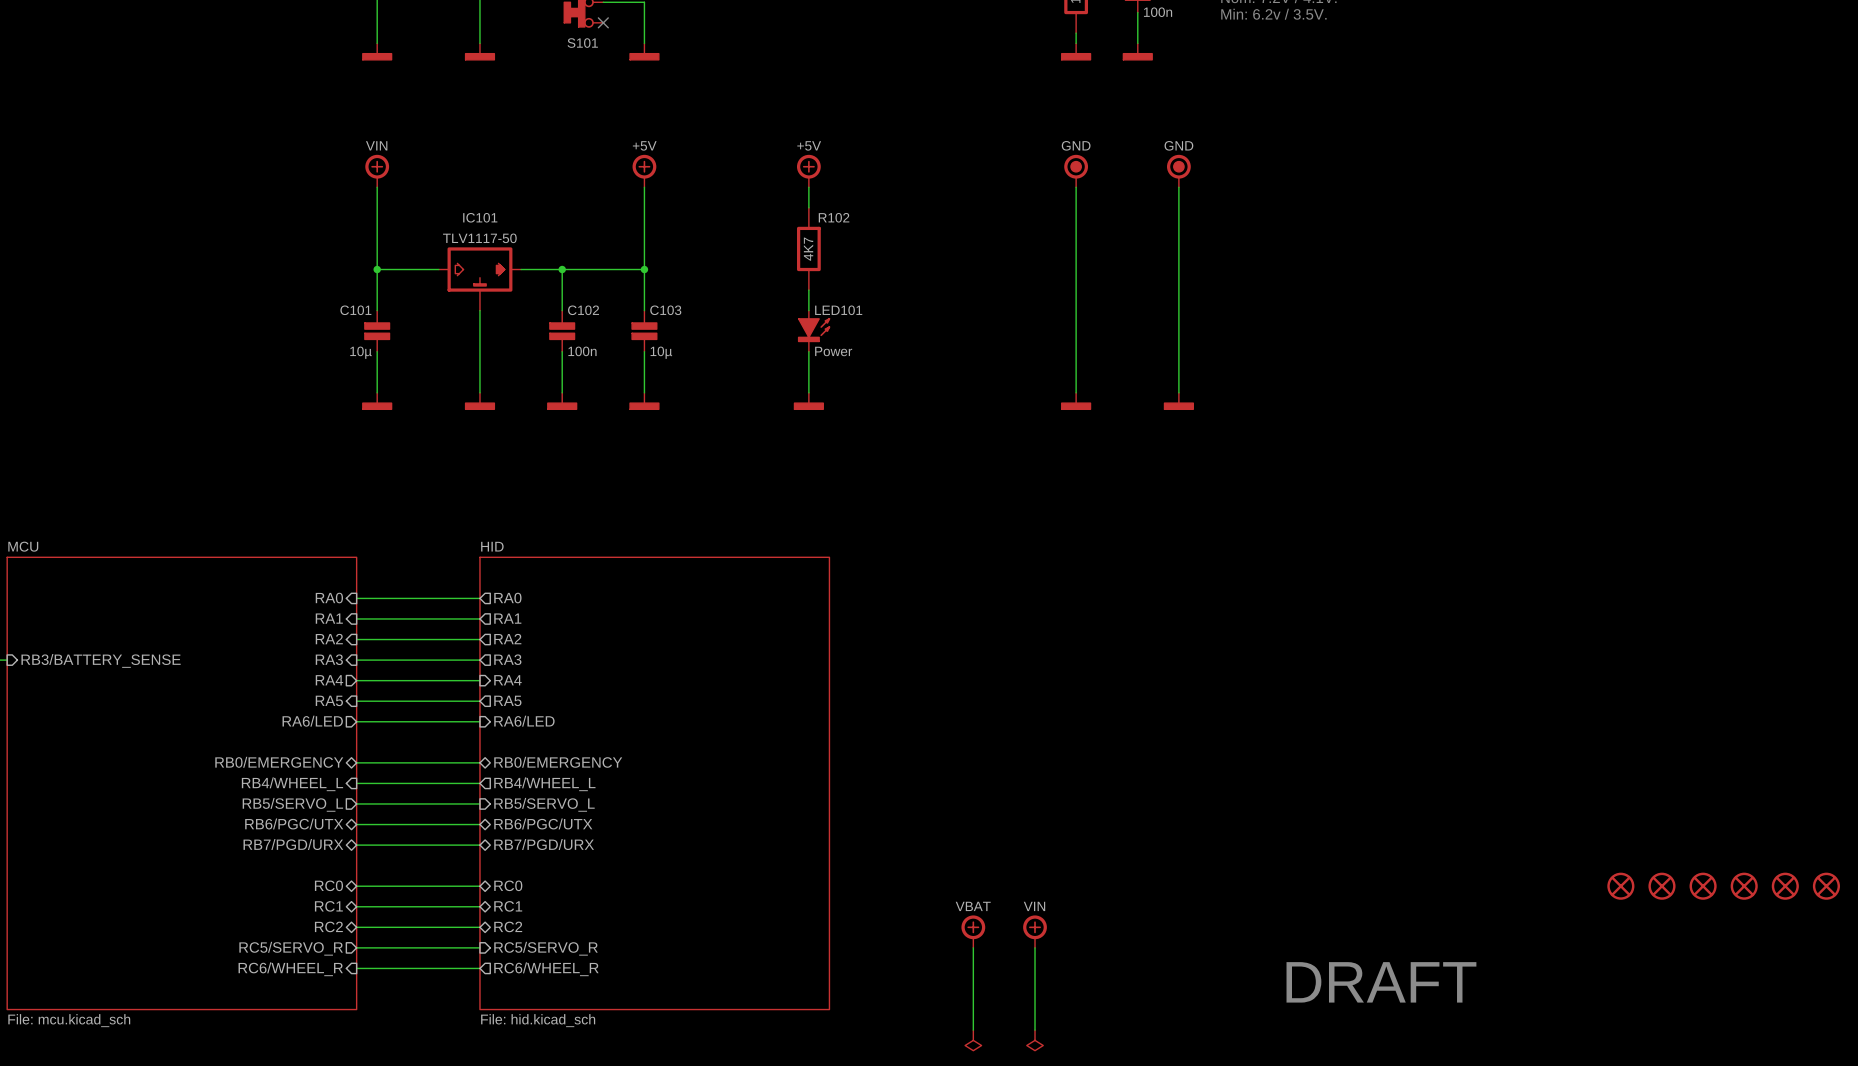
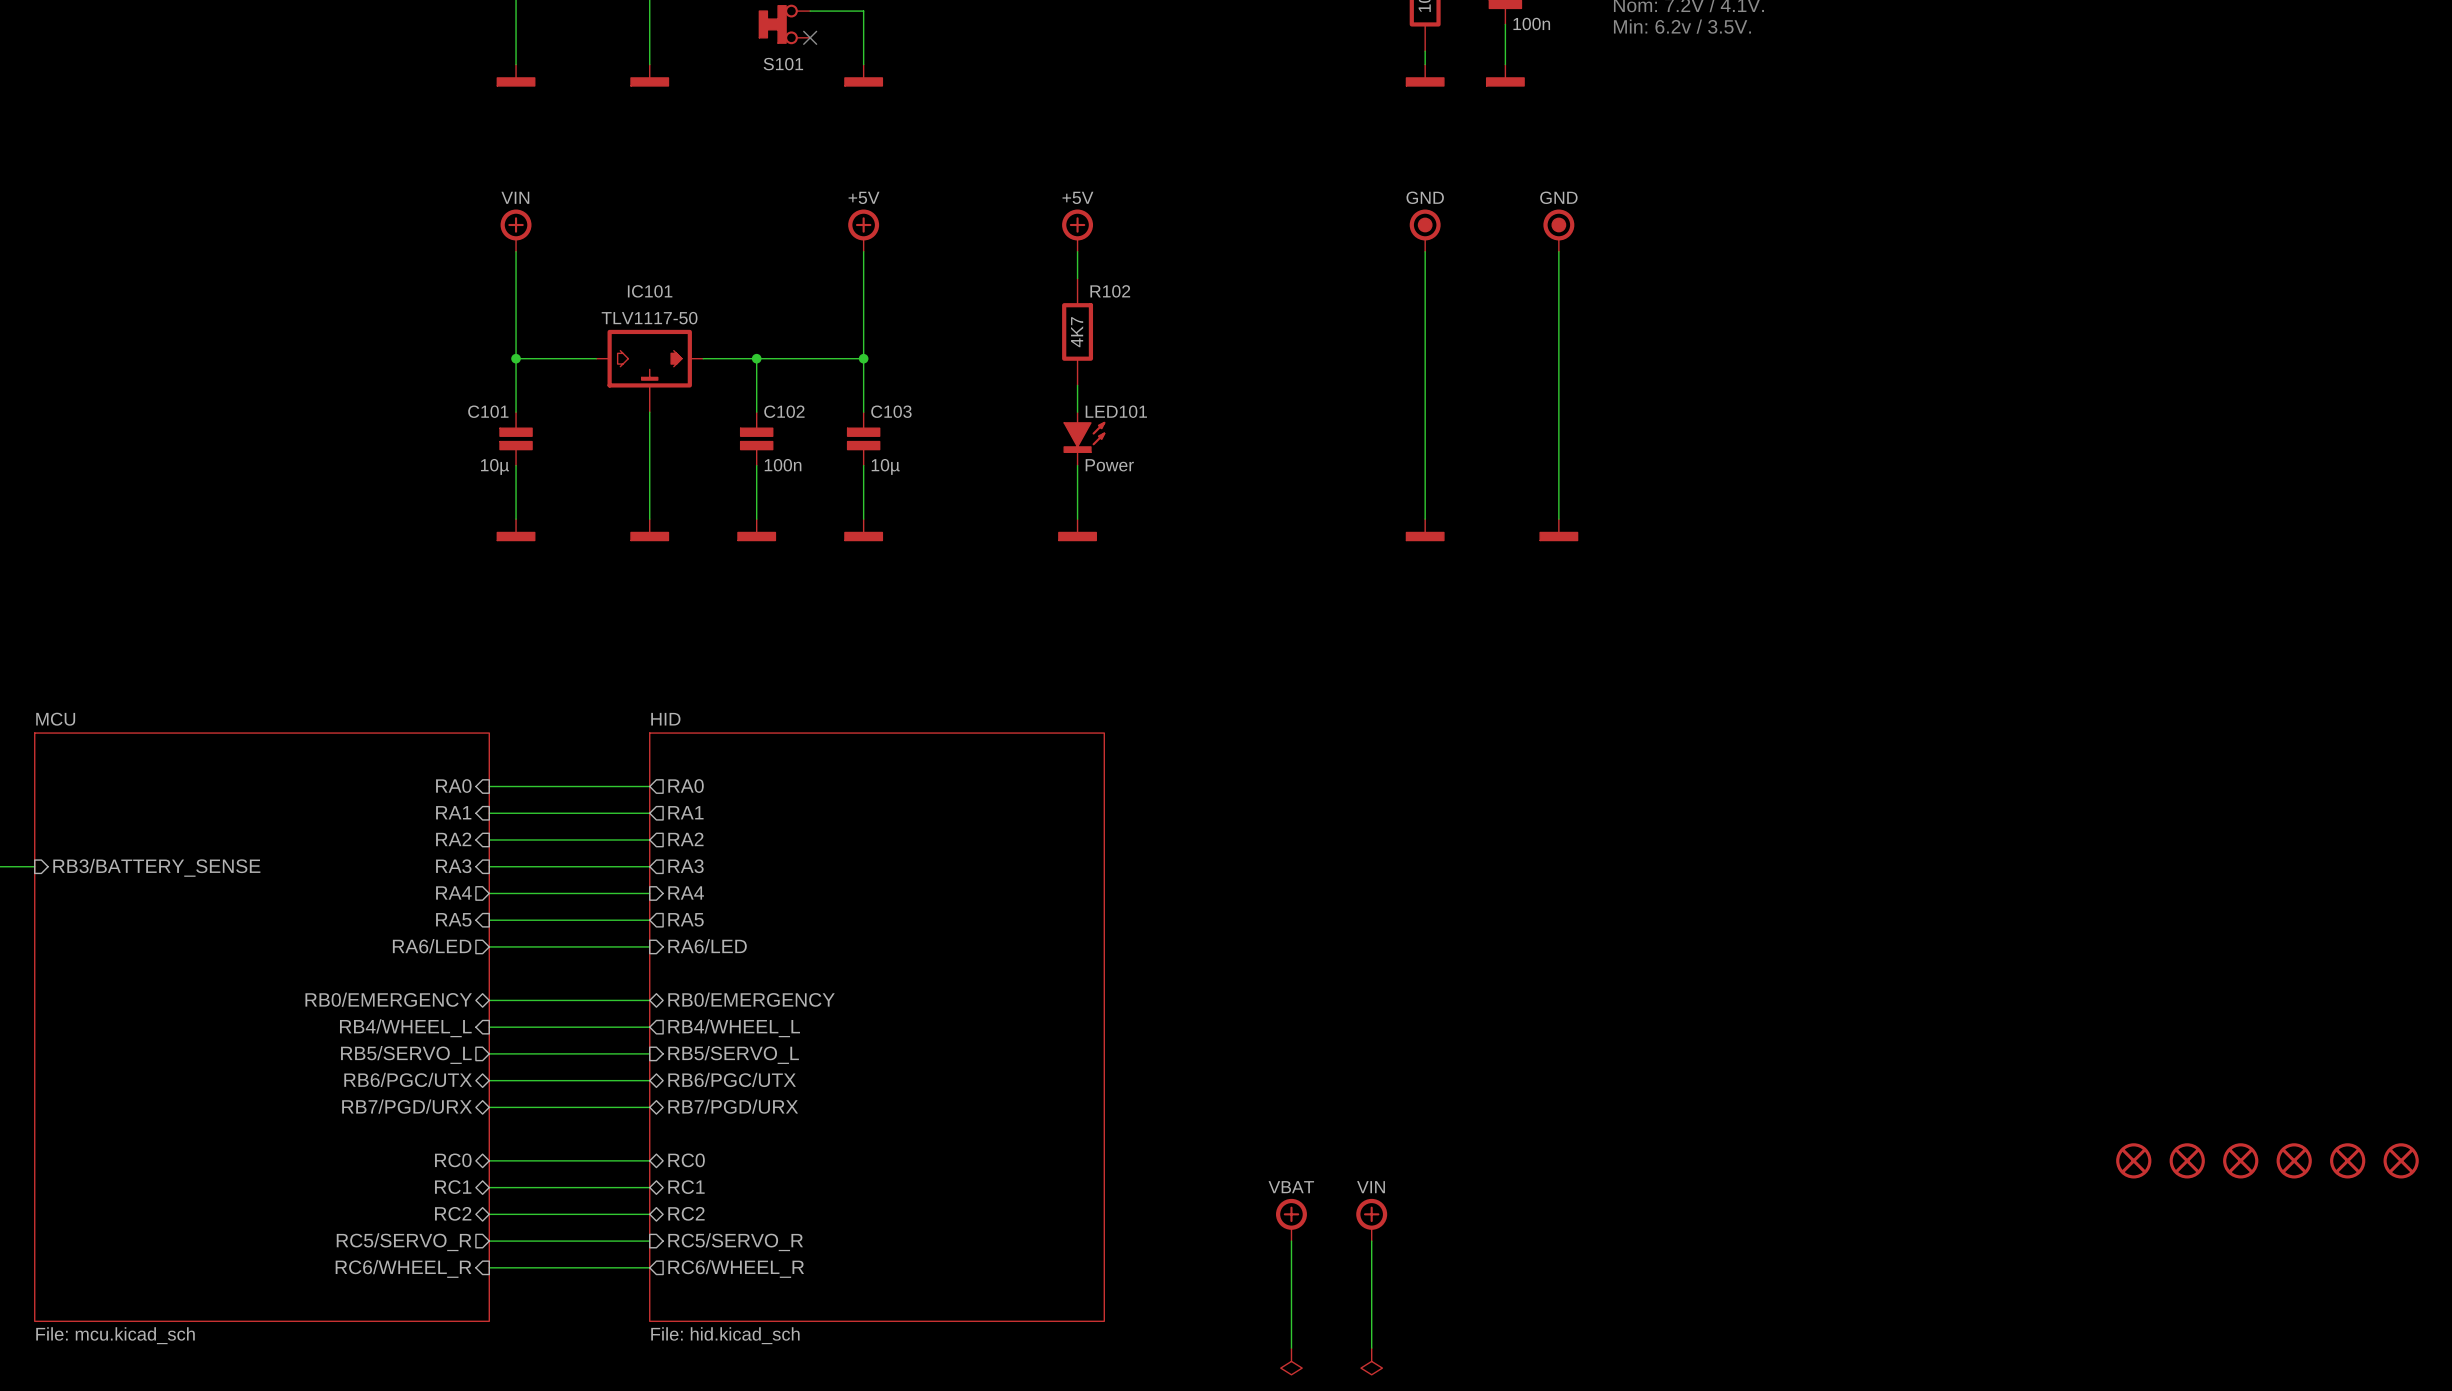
text: DRAFT (1381, 982) -> none

